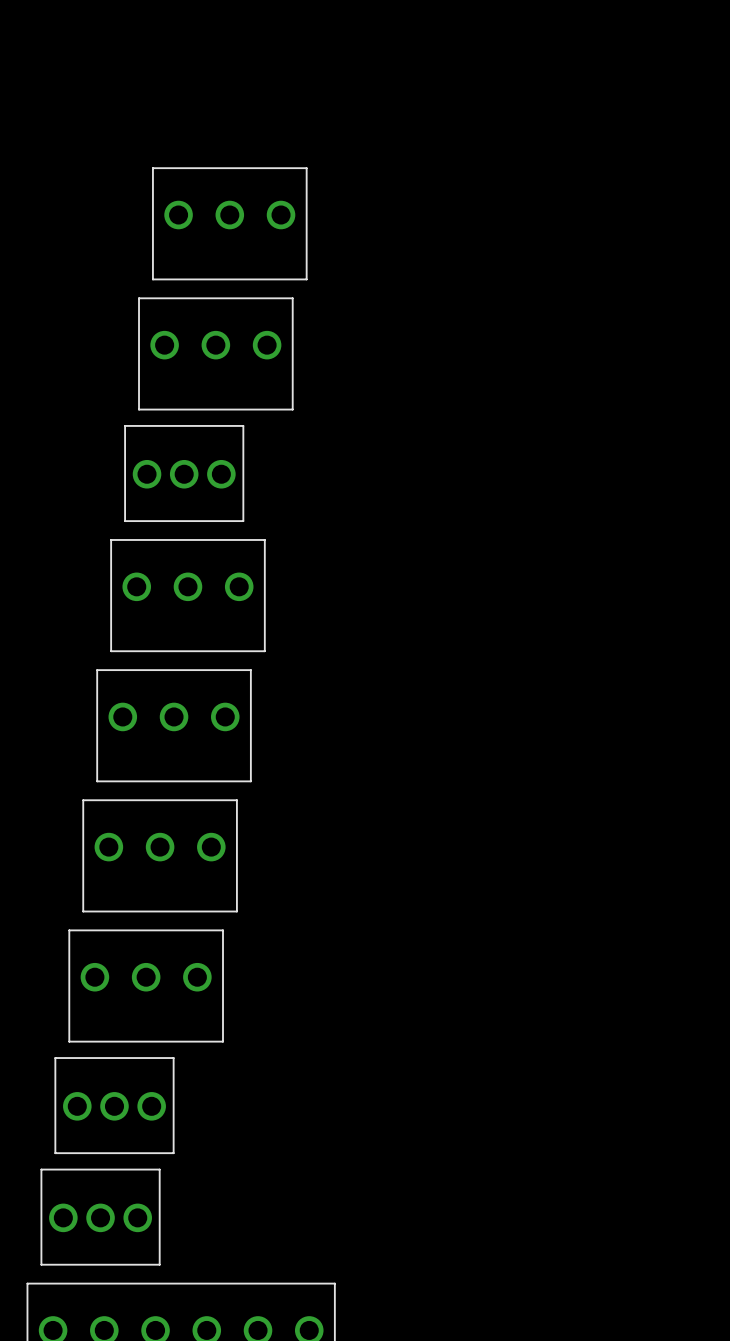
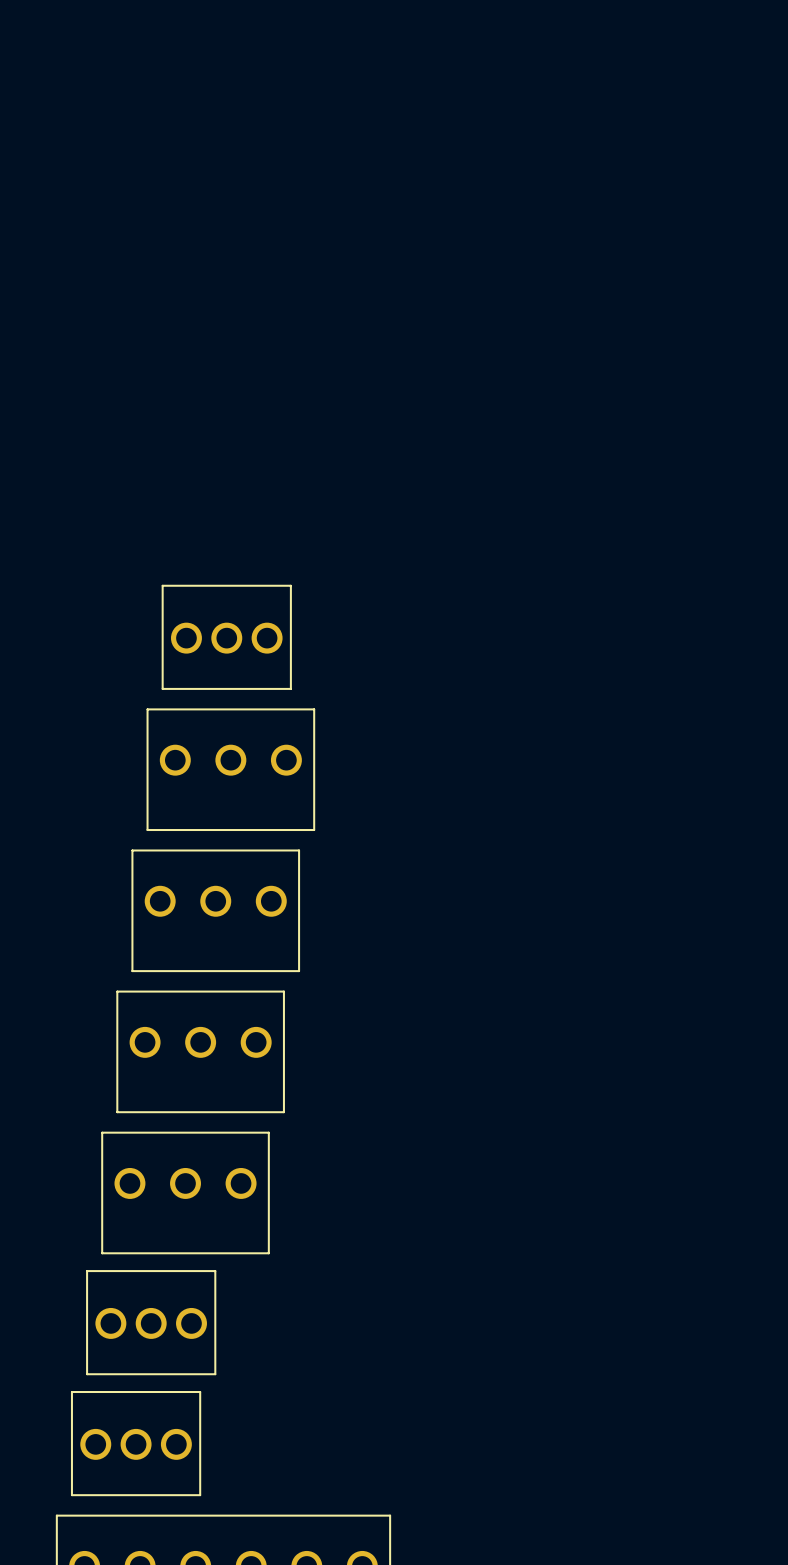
part: (229, 223) -> none
part: (215, 353) -> none

